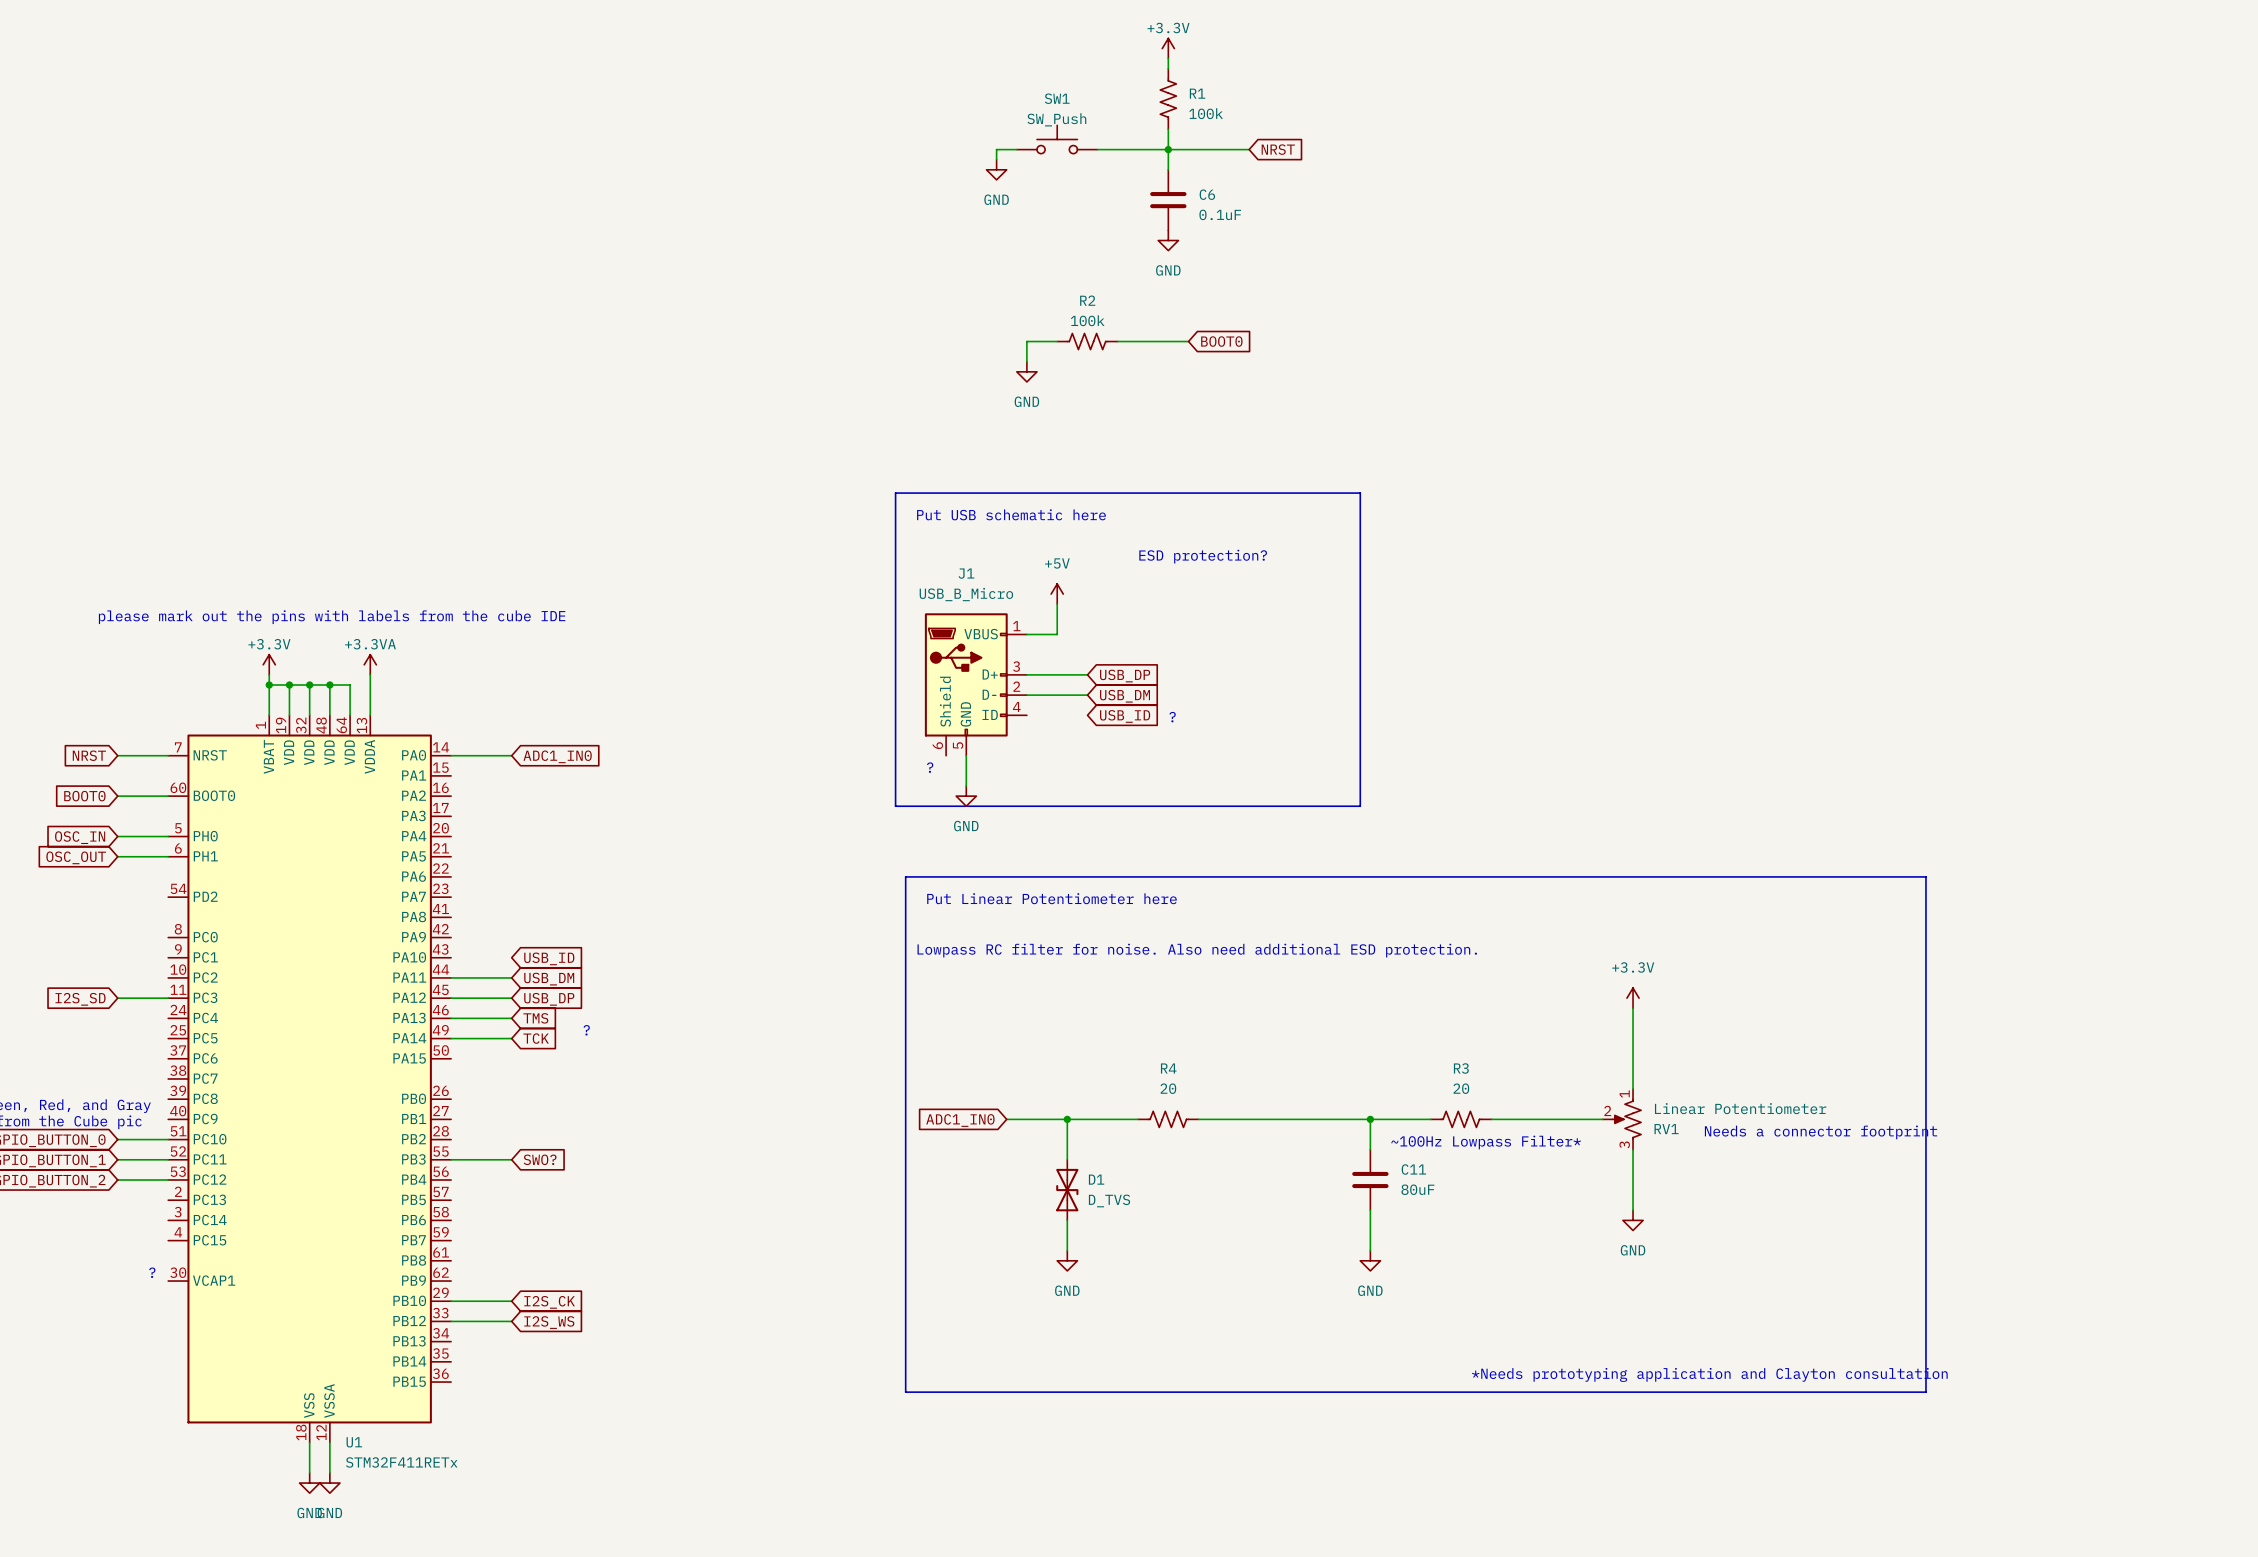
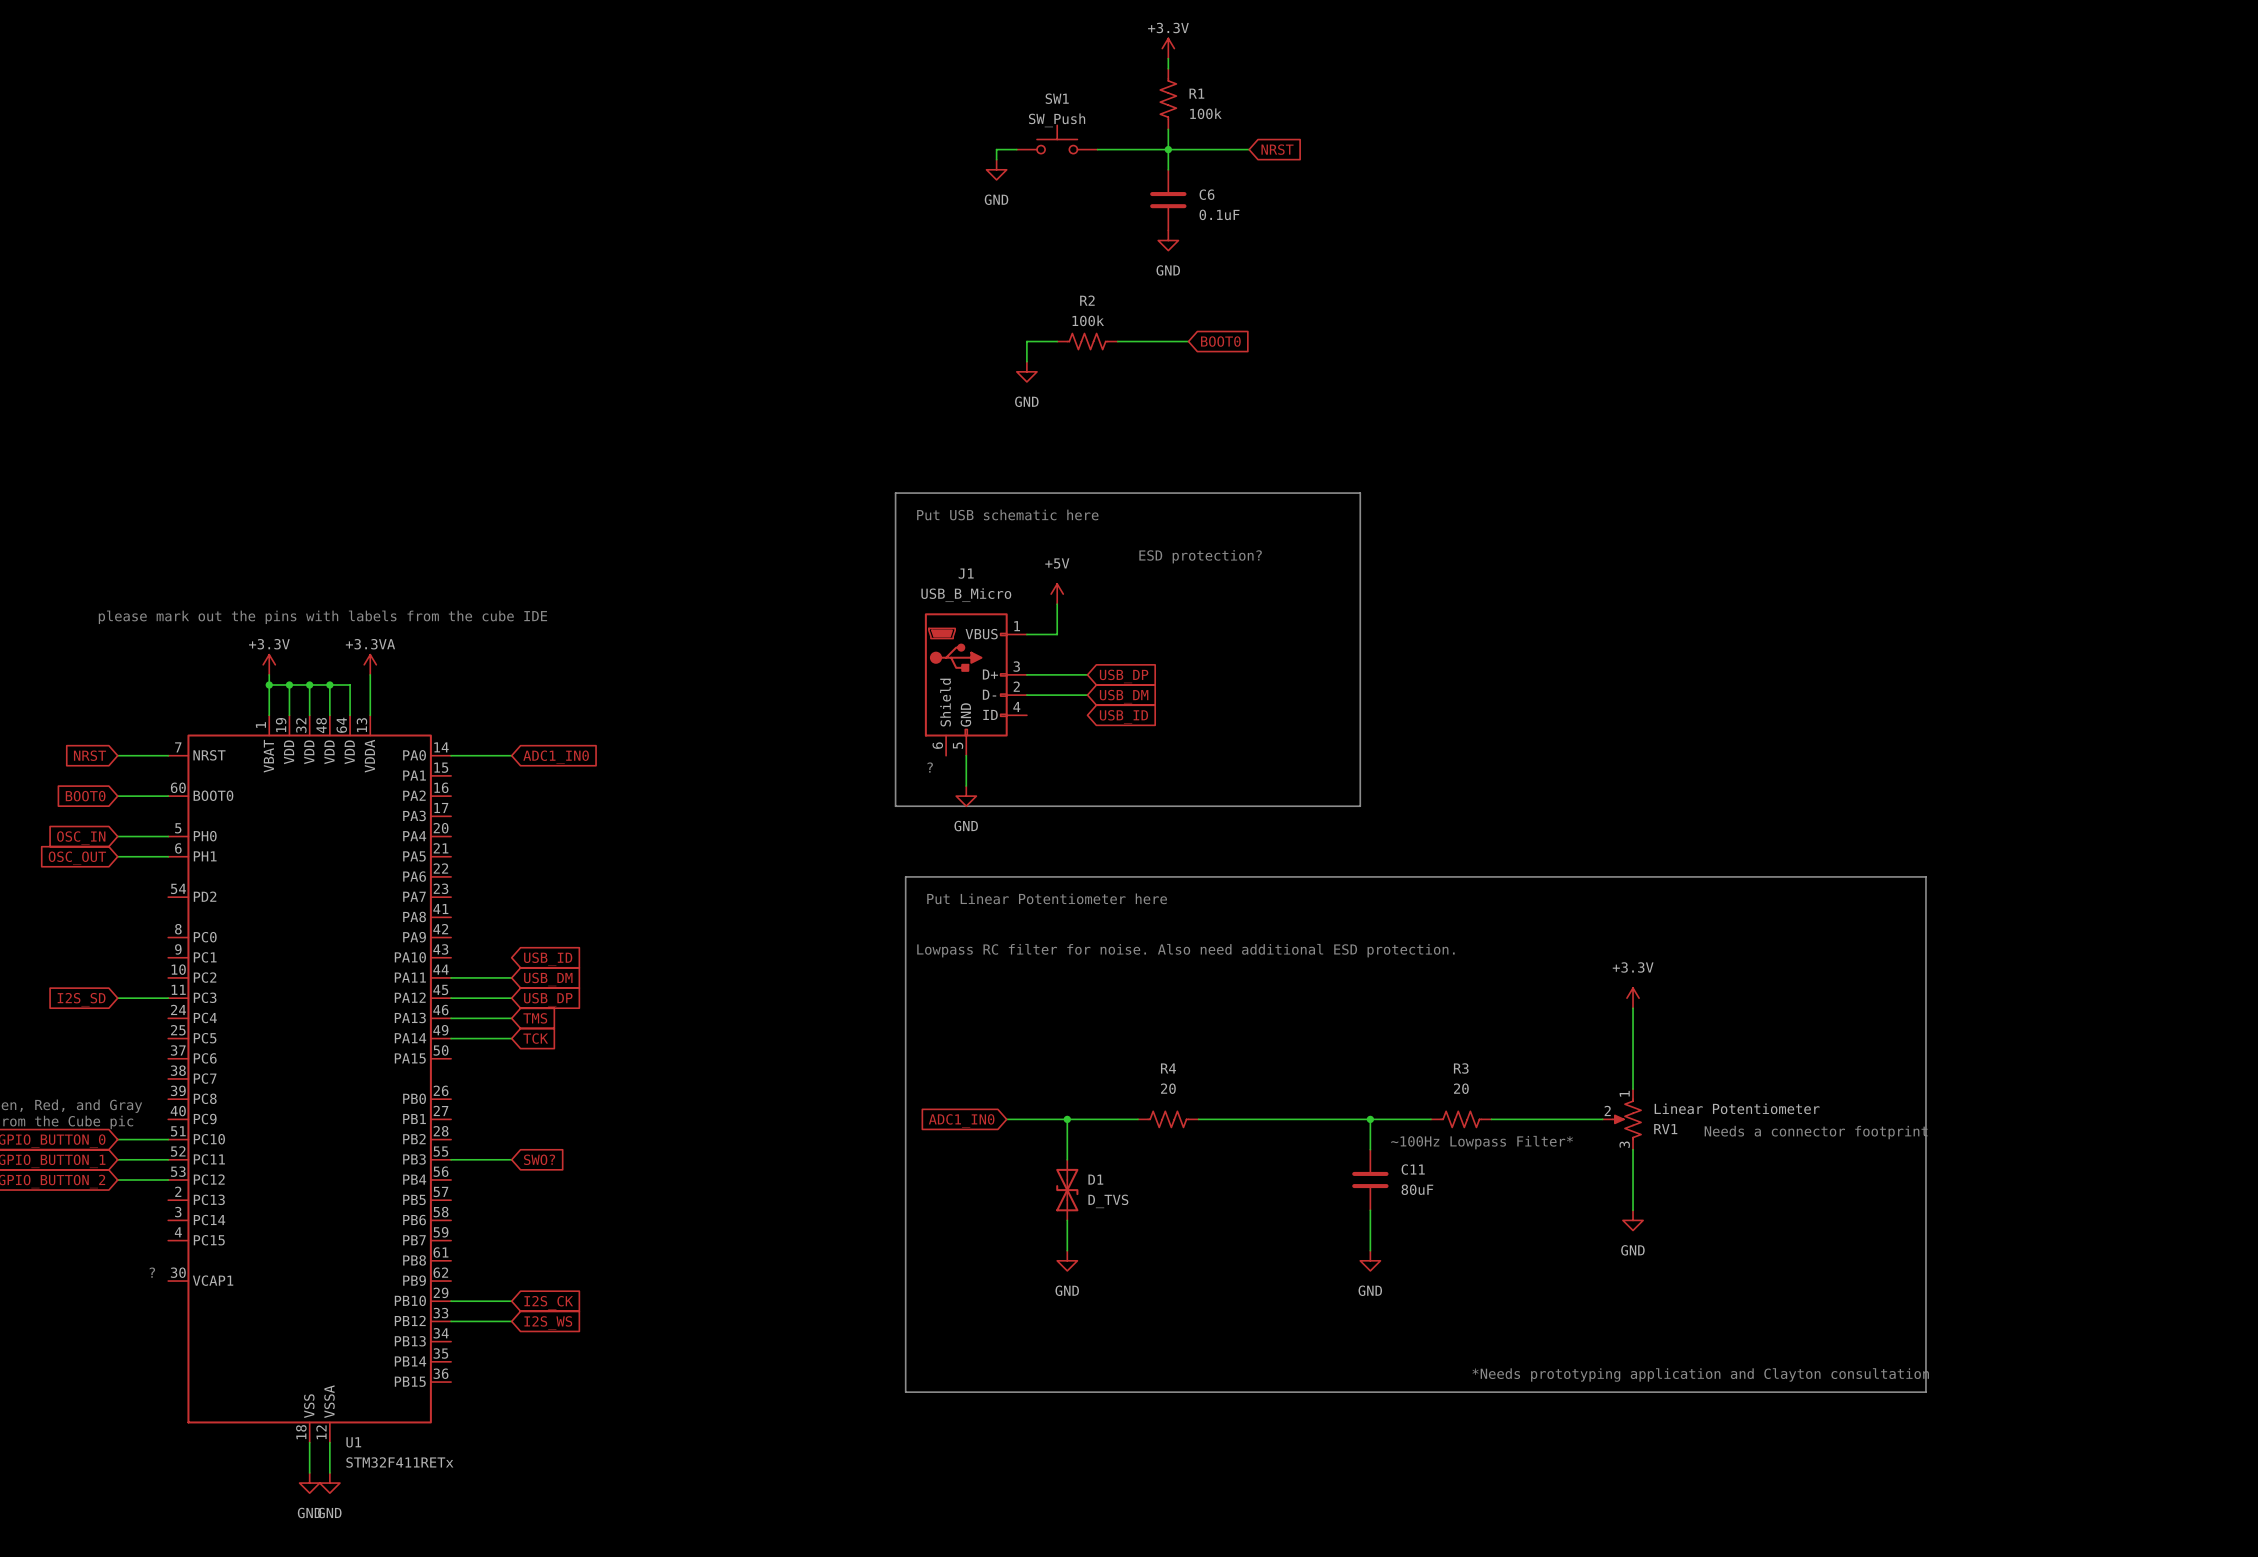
text: ? (1172, 717) -> none
text: ? (586, 1030) -> none

